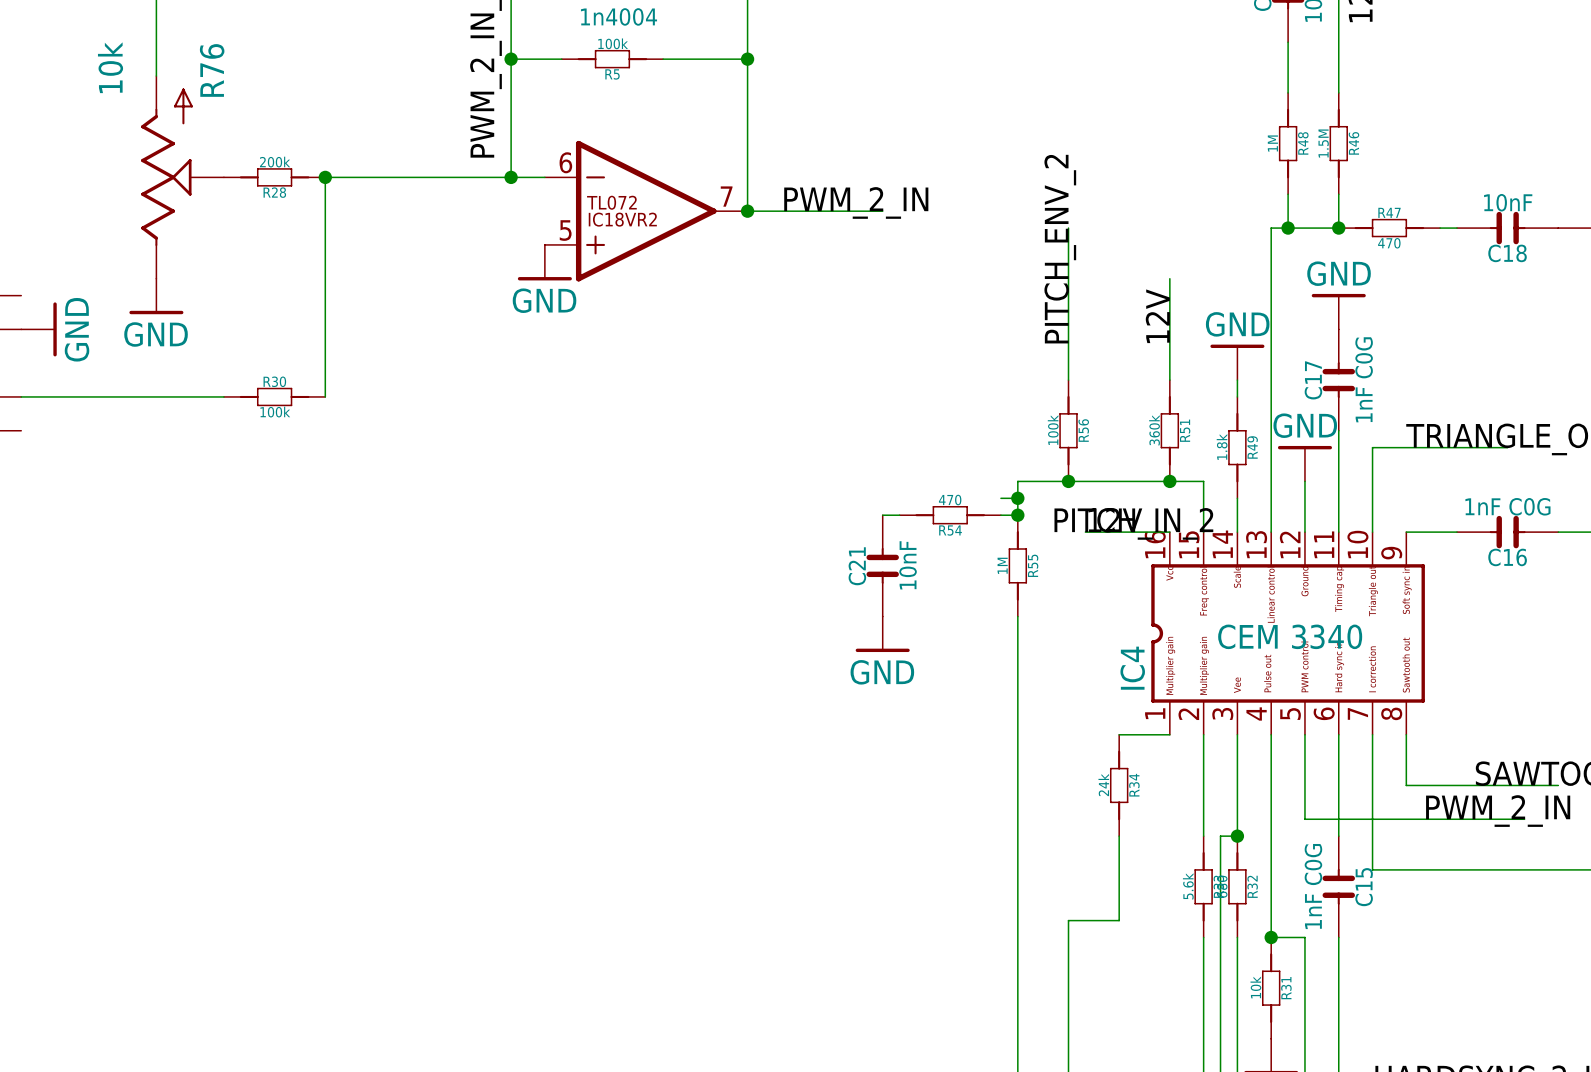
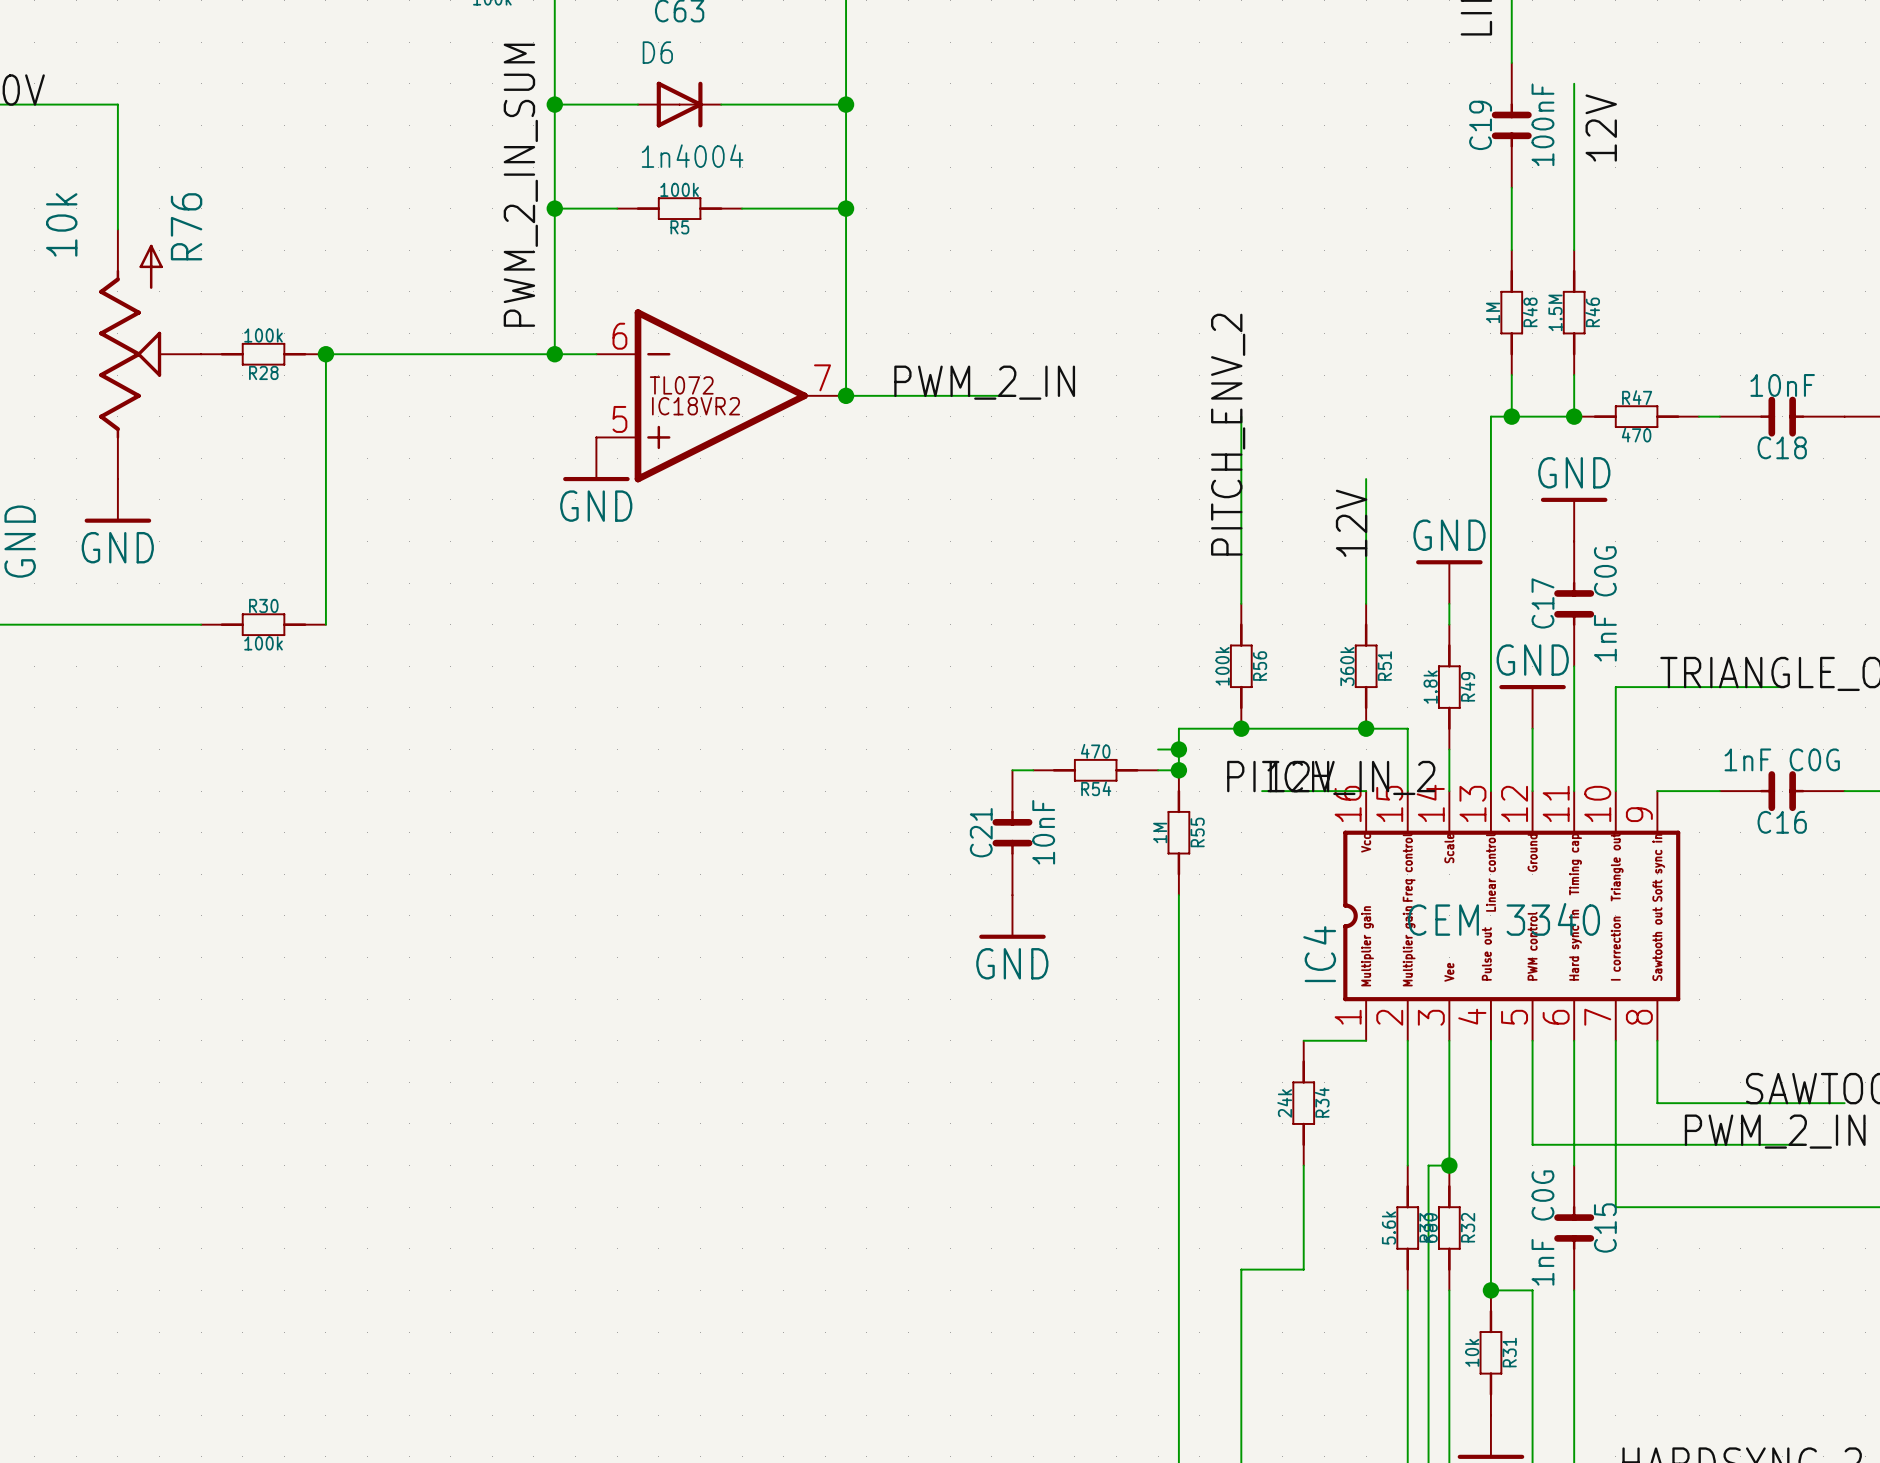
R28 value: 200k (275, 162) -> 100k (263, 335)

